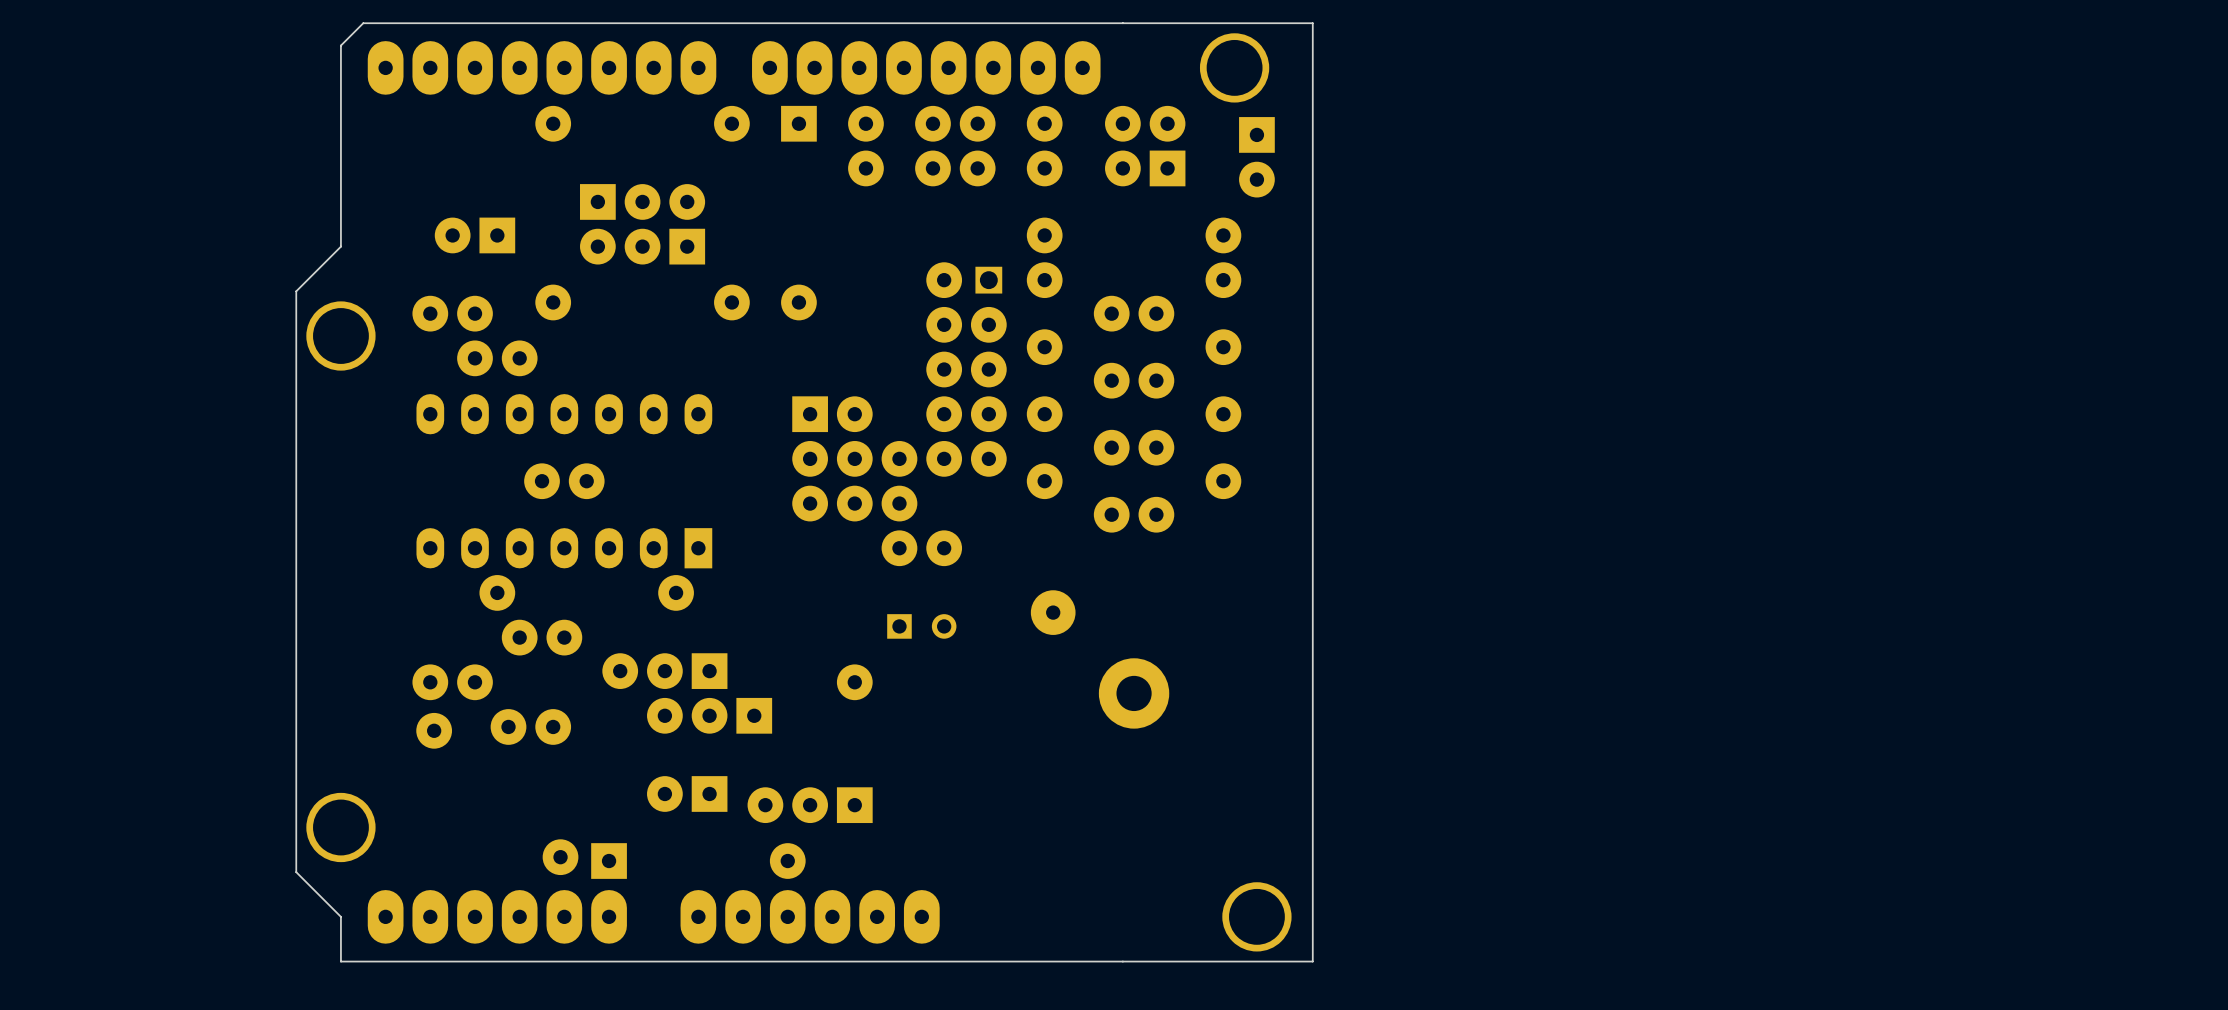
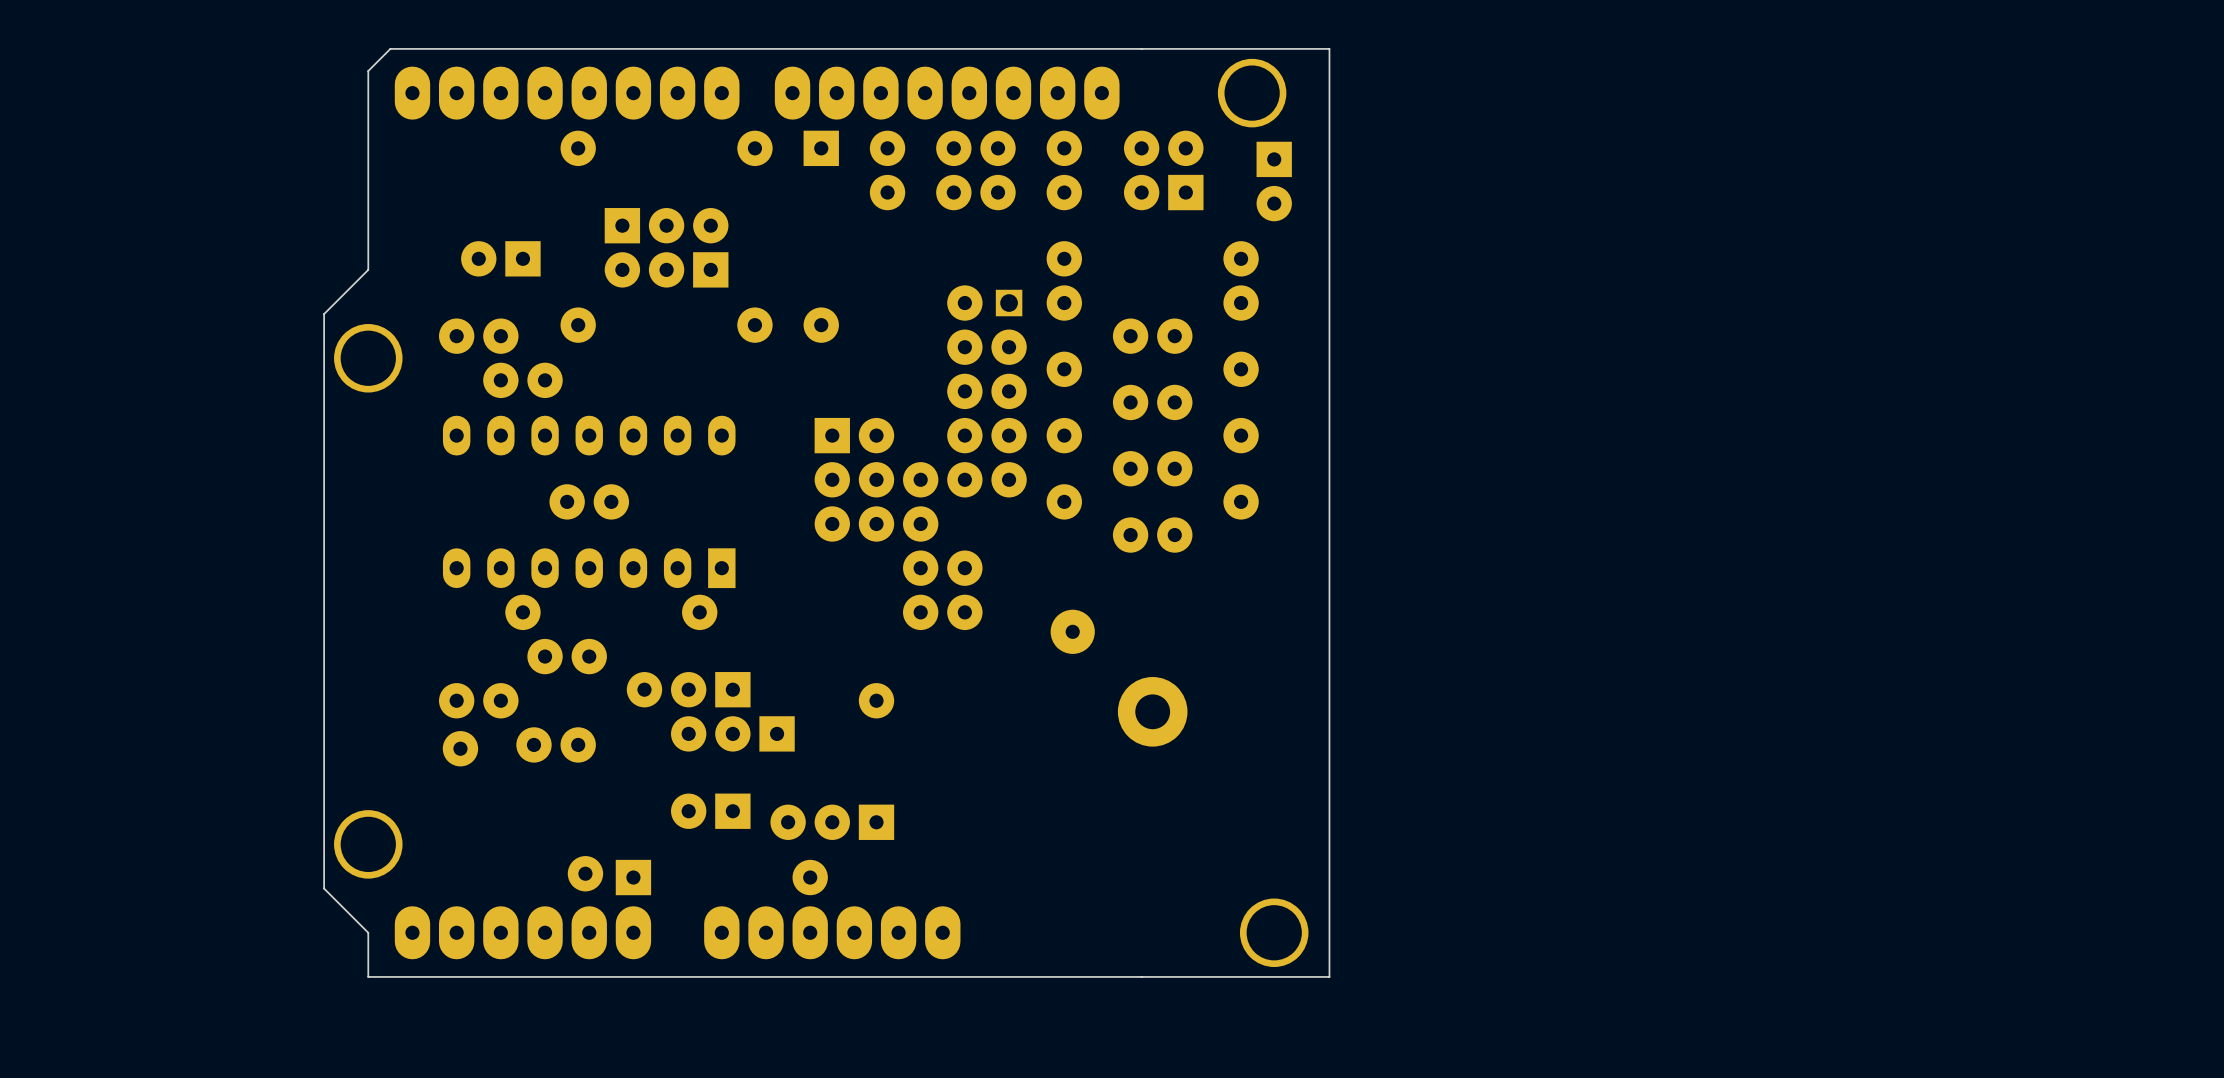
part: none -> (942, 612)
part: (921, 626) -> none

